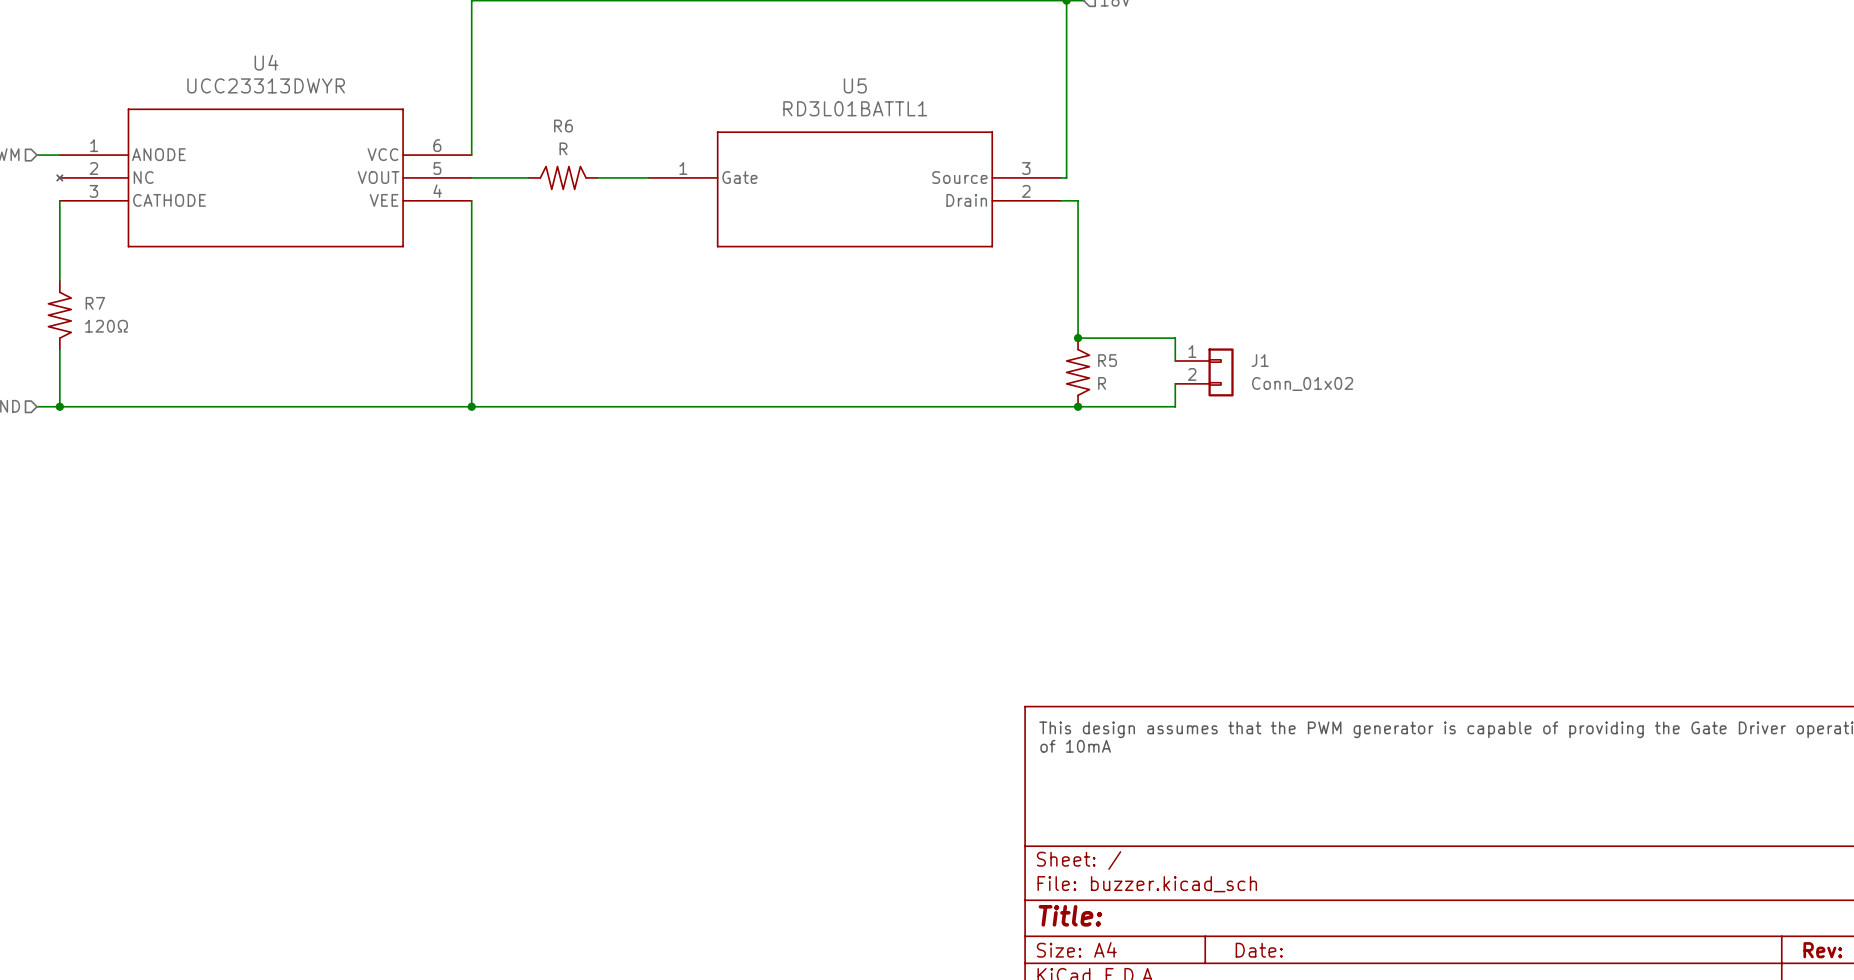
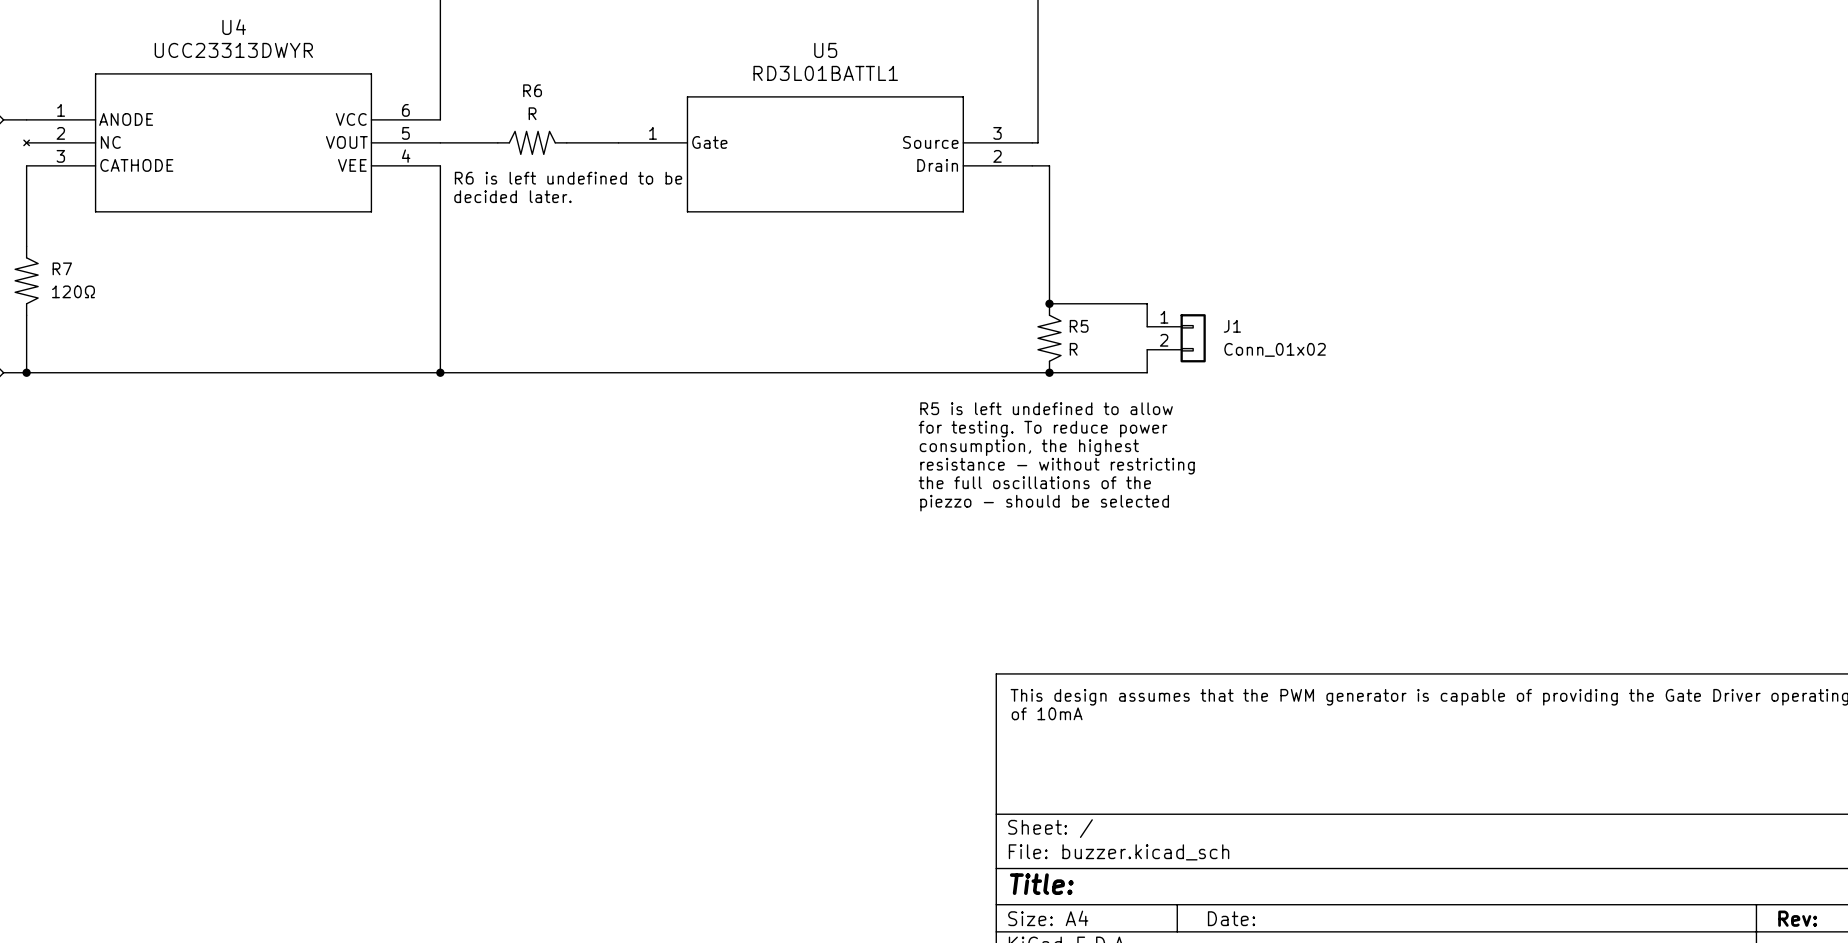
text: none -> R6 is left undefined to be (568, 178)
text: none -> decided later. (512, 196)
text: none -> R5 is left undefined to allow (1046, 408)
text: none -> for testing. To reduce power (1043, 429)
text: none -> consumption, the highest (1029, 447)
text: none -> resistance - without restricting (1057, 466)
text: none -> the full oscillations of the (1034, 482)
text: none -> piezzo - should be selected (1044, 503)

